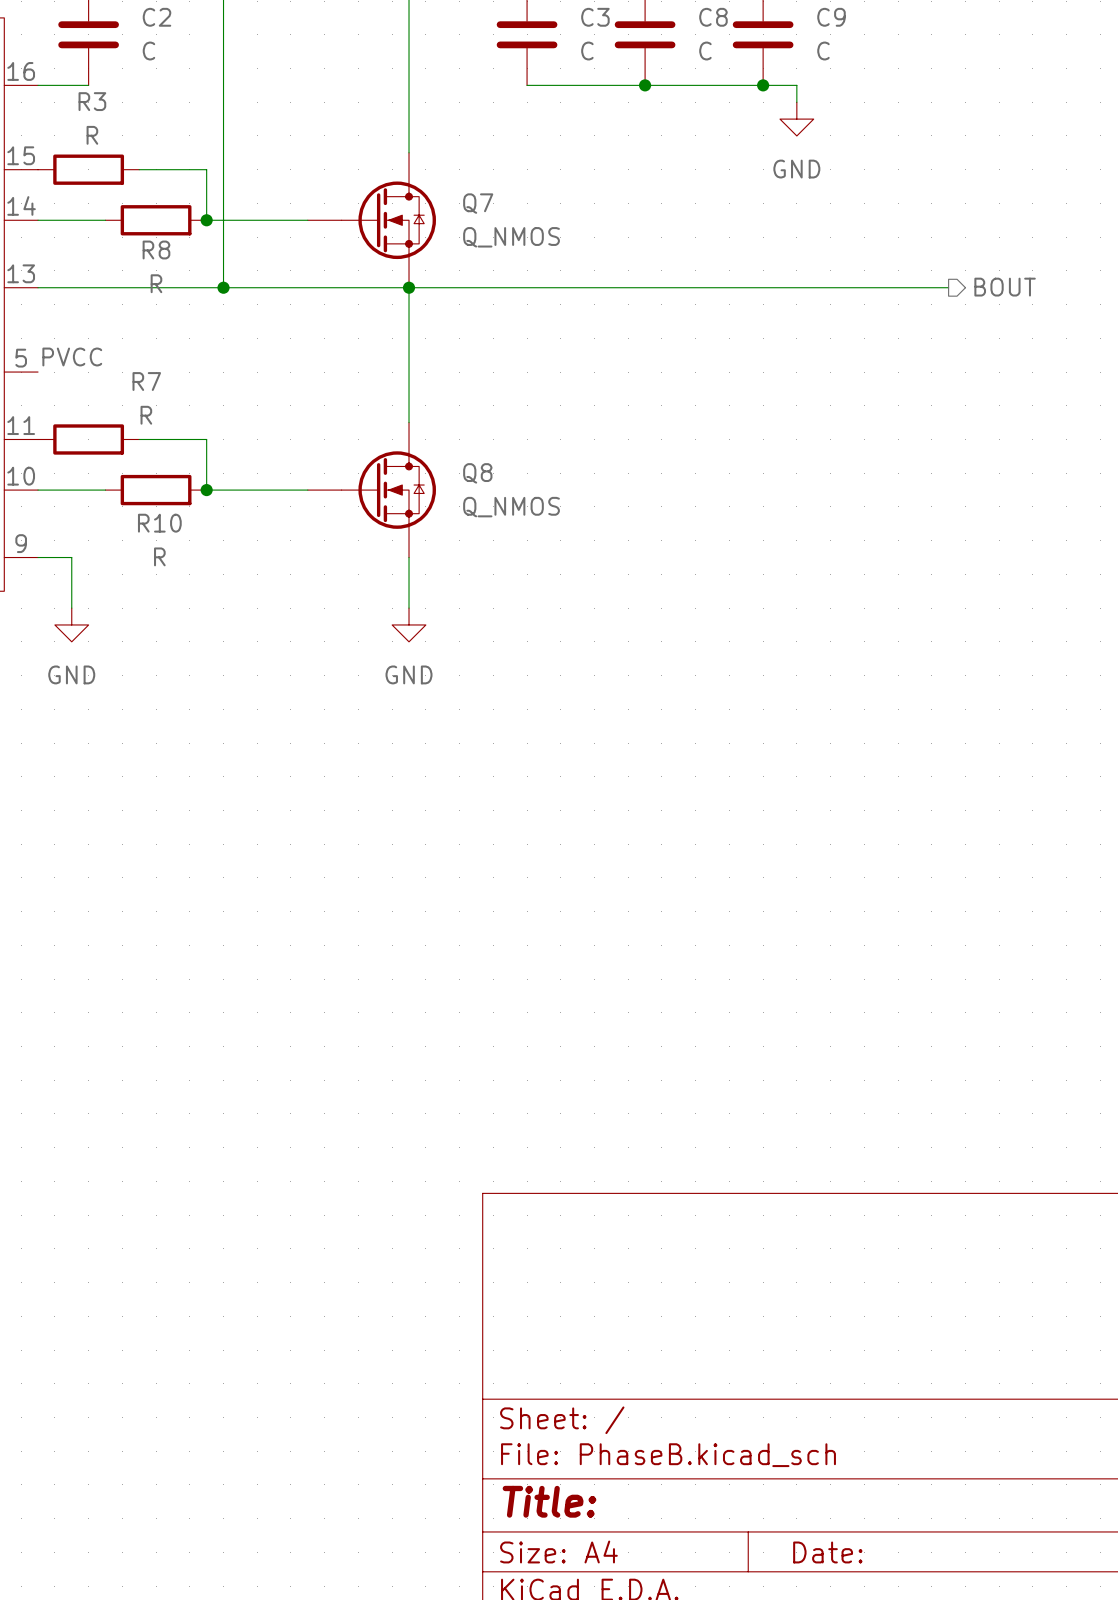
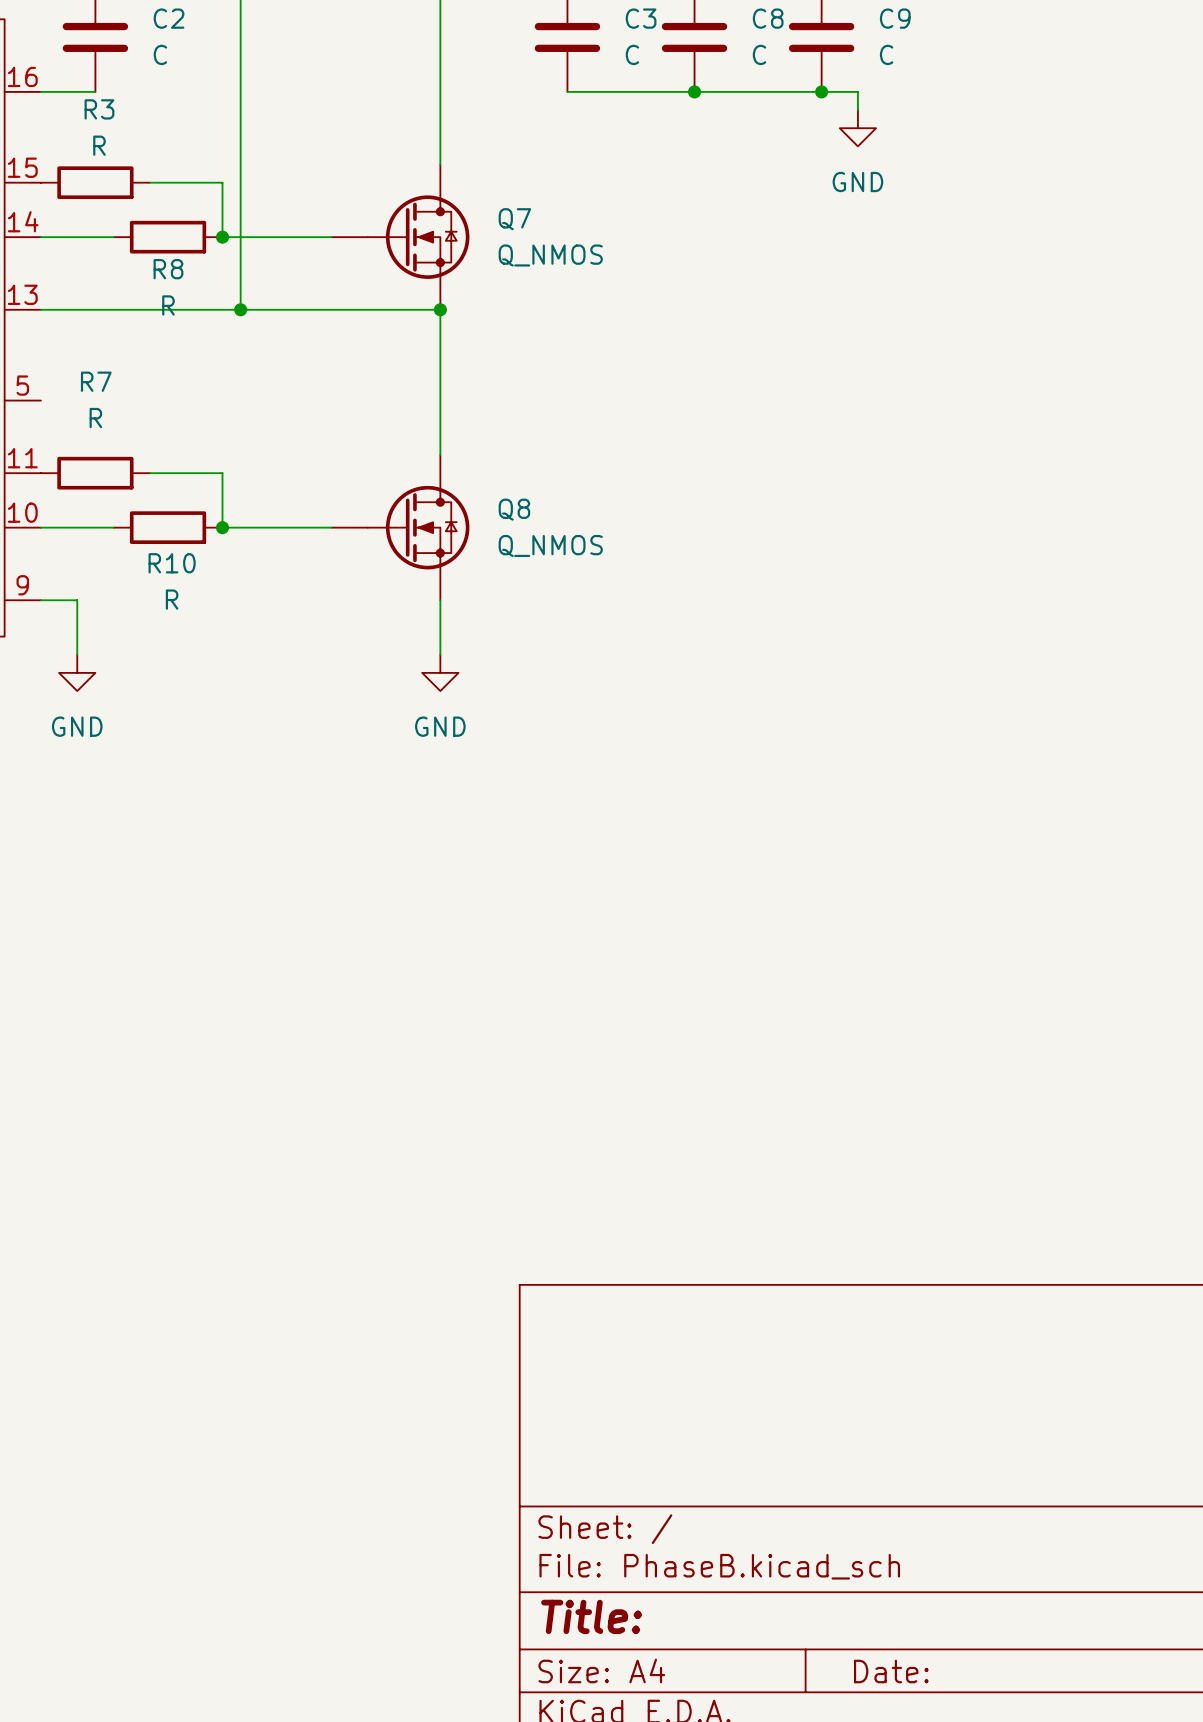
wire: (409, 287) (948, 287) -> none
hierarchical label: BOUT (1005, 287) -> none
label: PVCC (72, 356) -> none
R7 name position: R7 (146, 381) -> R7 (96, 381)
R7 value position: R (146, 415) -> R (95, 418)

